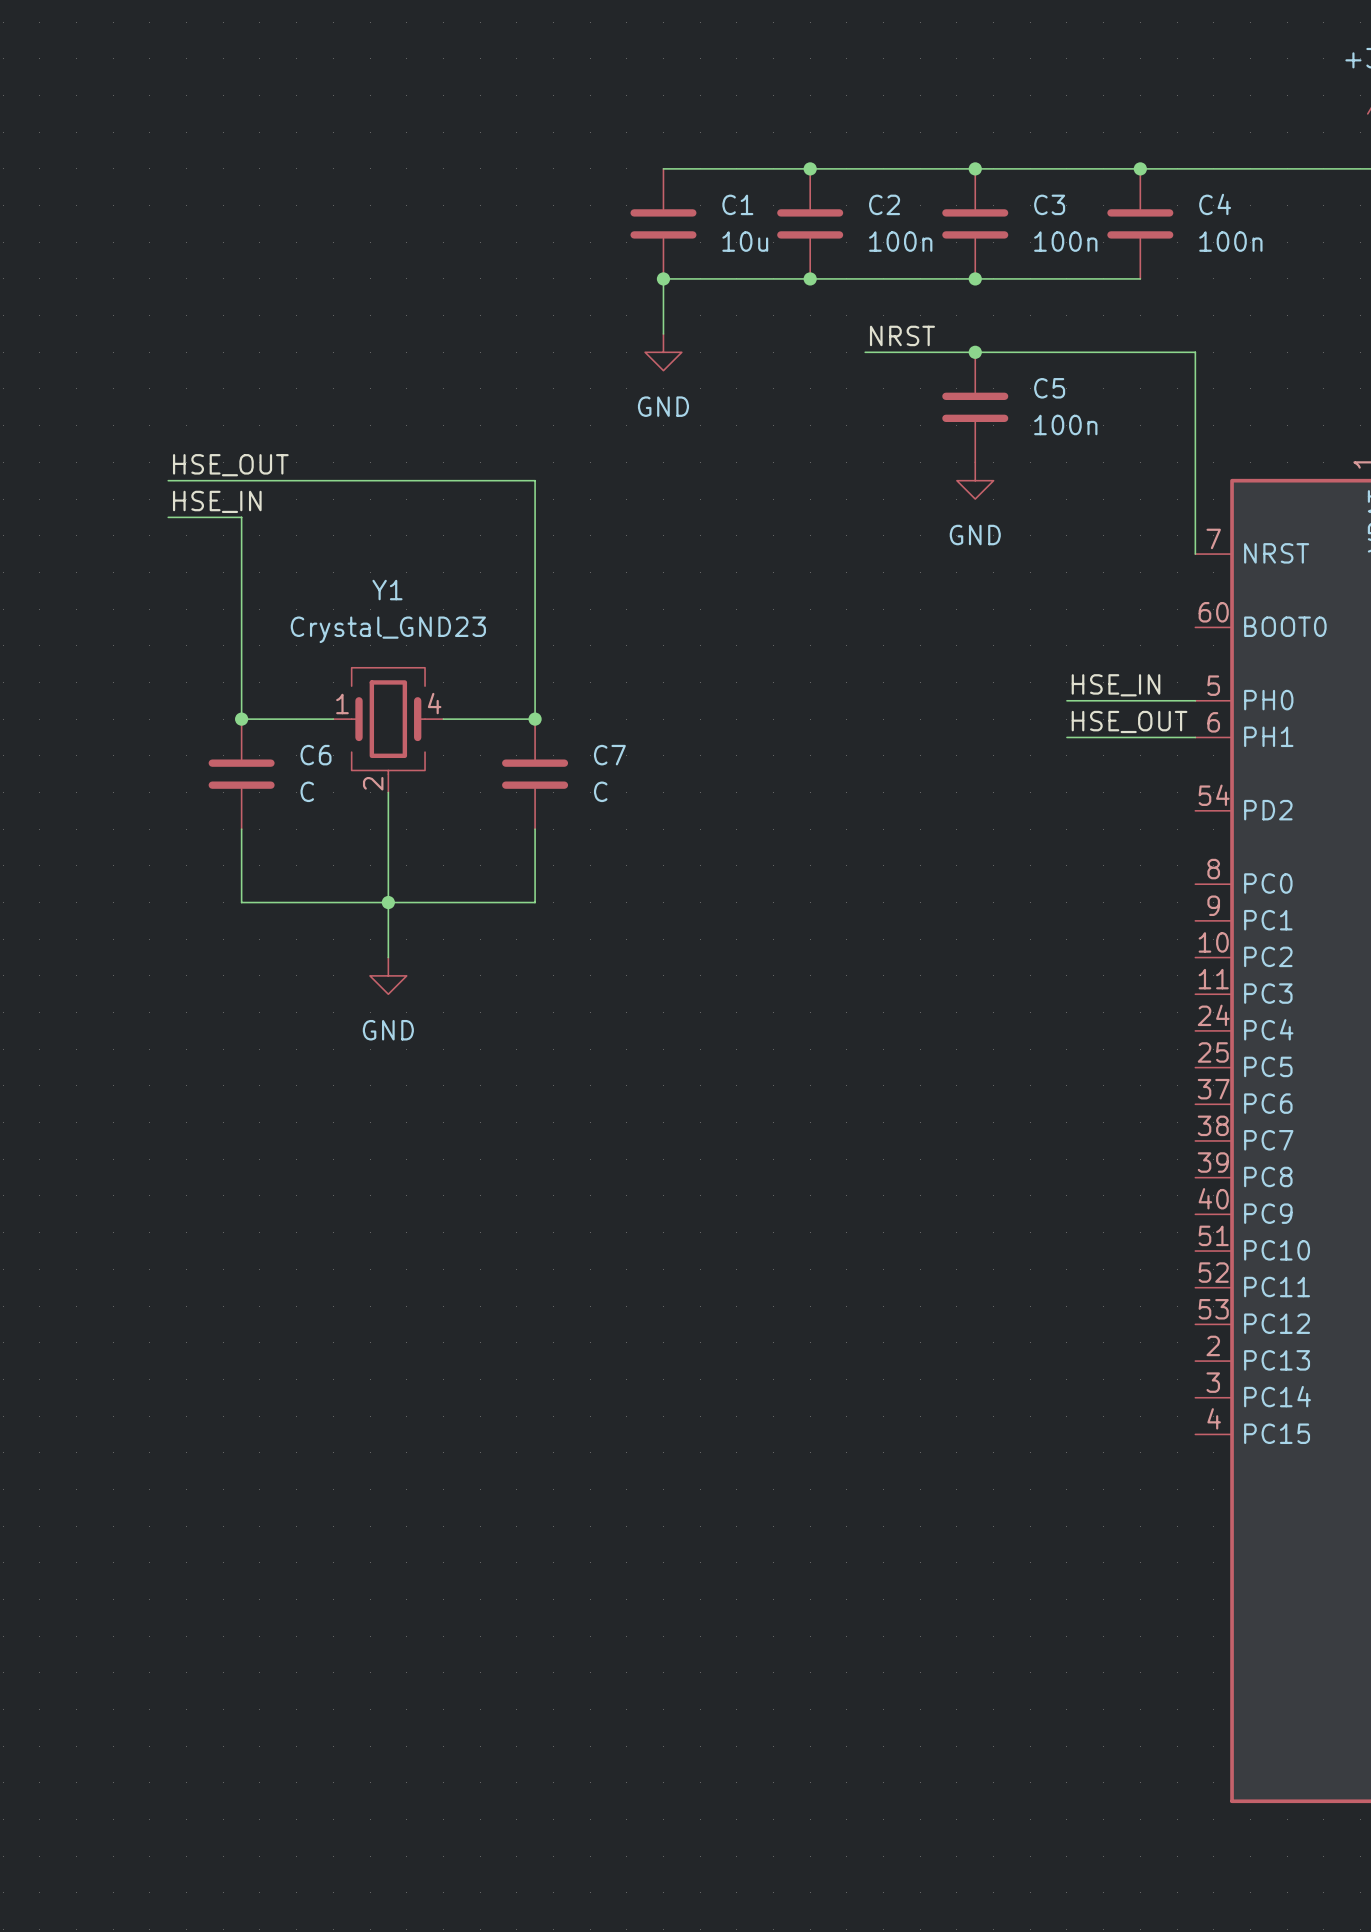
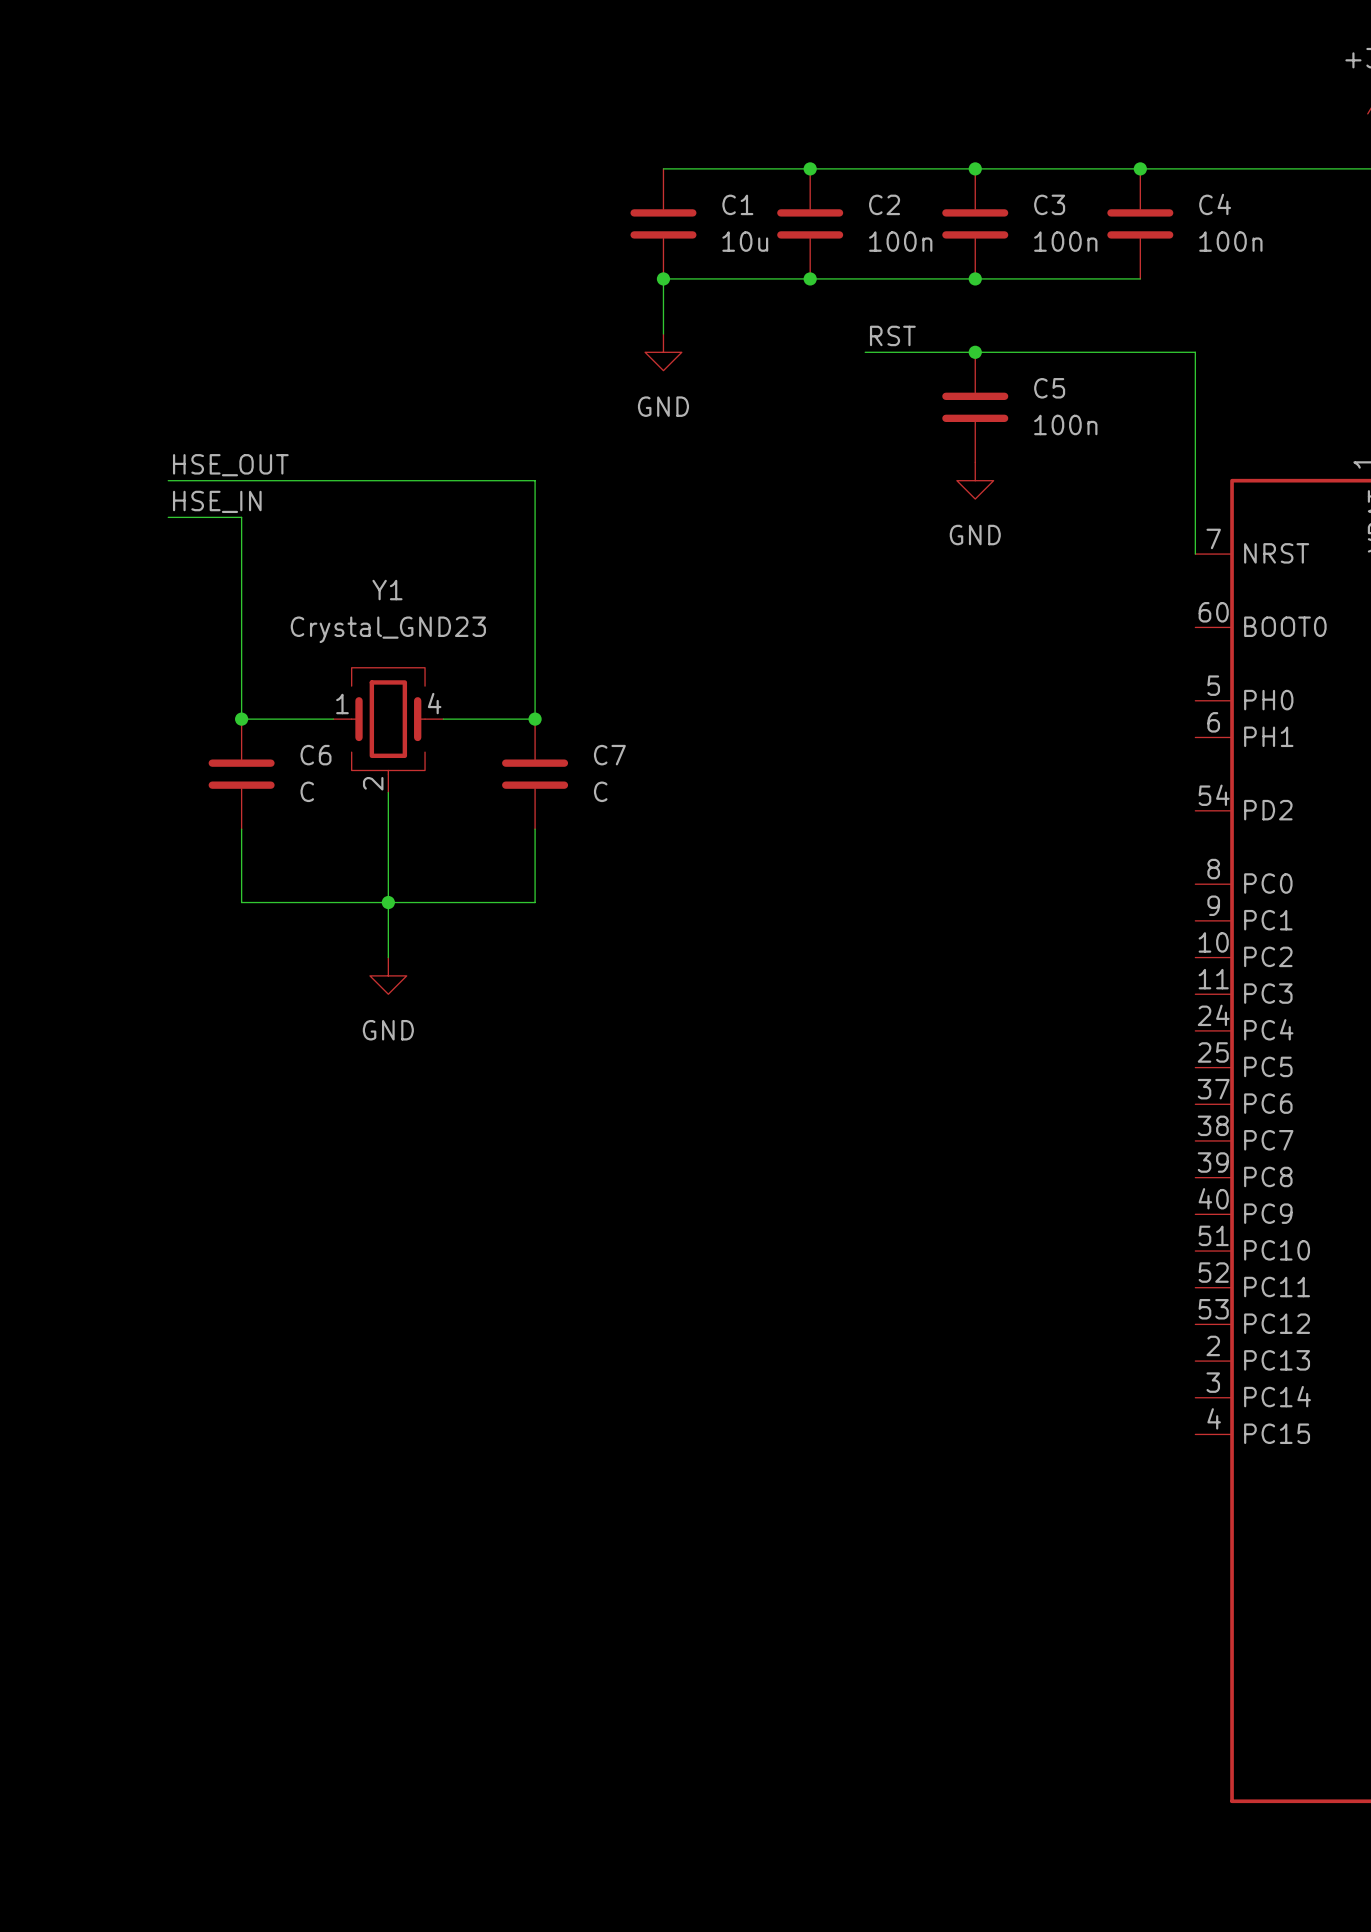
label: NRST (902, 335) -> RST (892, 335)
label: HSE_IN (1116, 685) -> none
wire: (1066, 700) (1195, 700) -> none
label: HSE_OUT (1129, 721) -> none
wire: (1066, 737) (1195, 737) -> none

